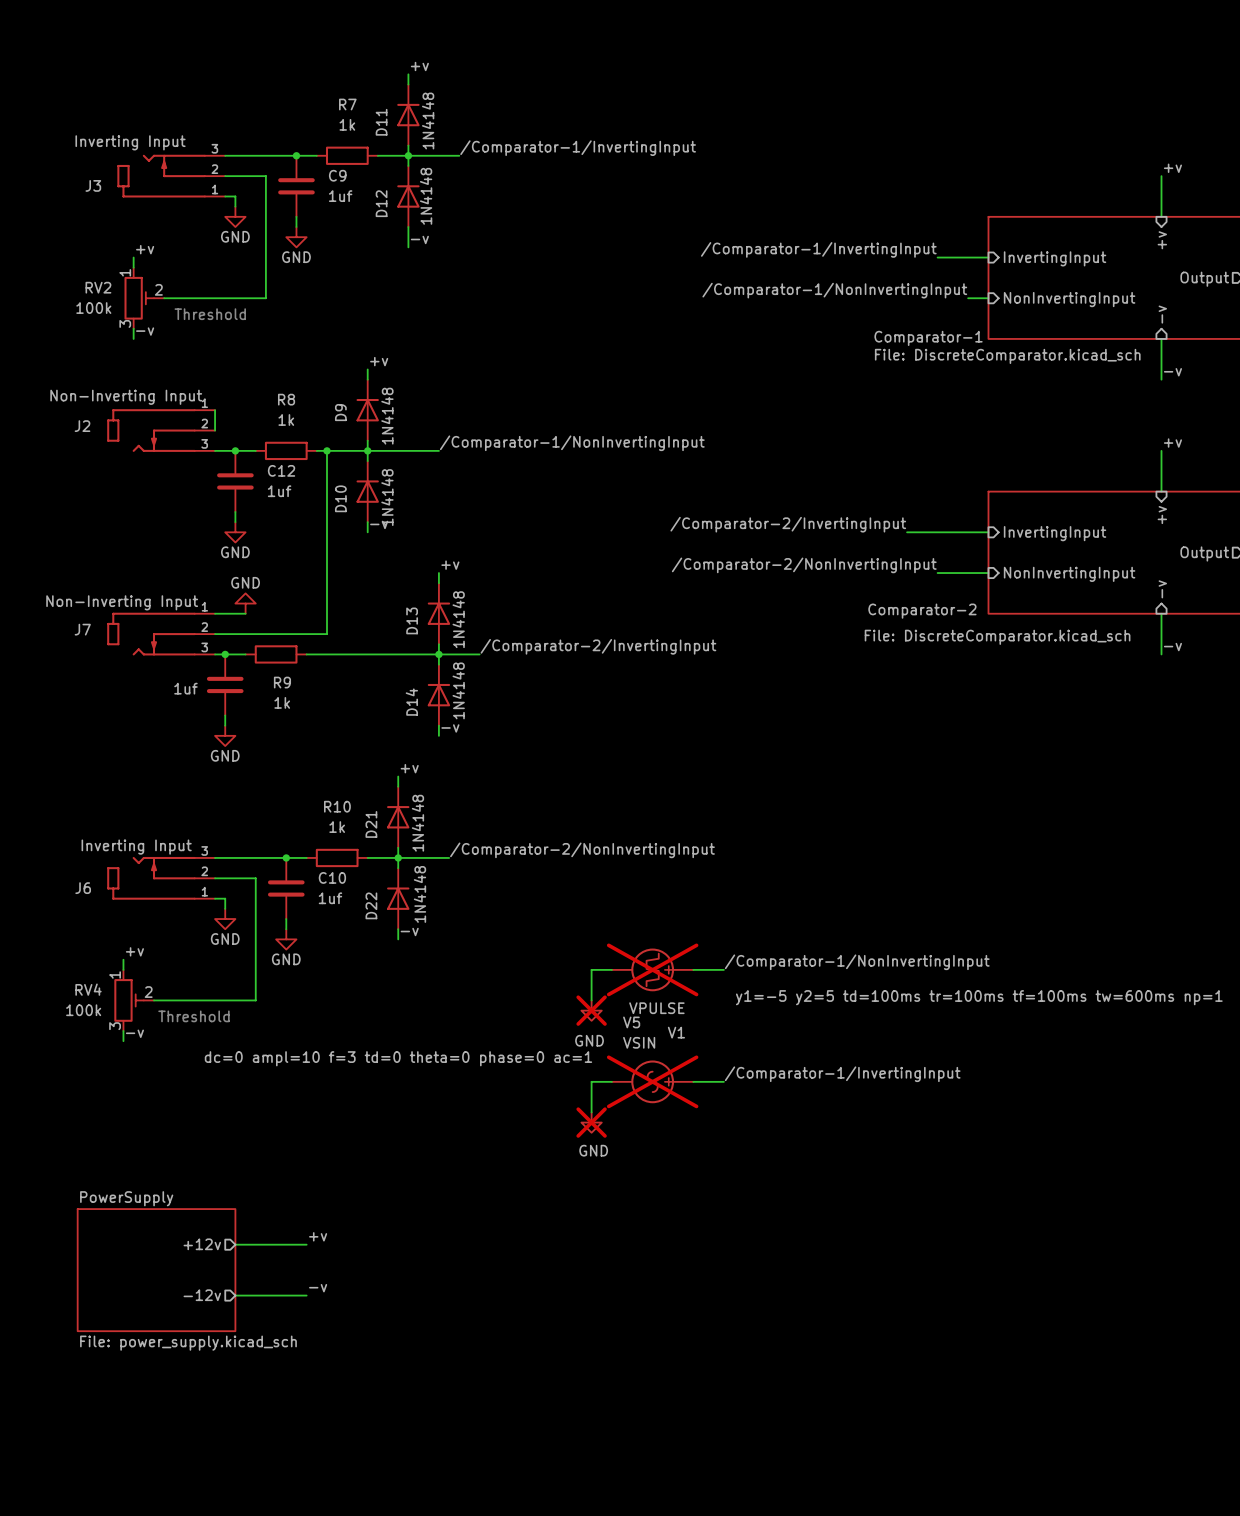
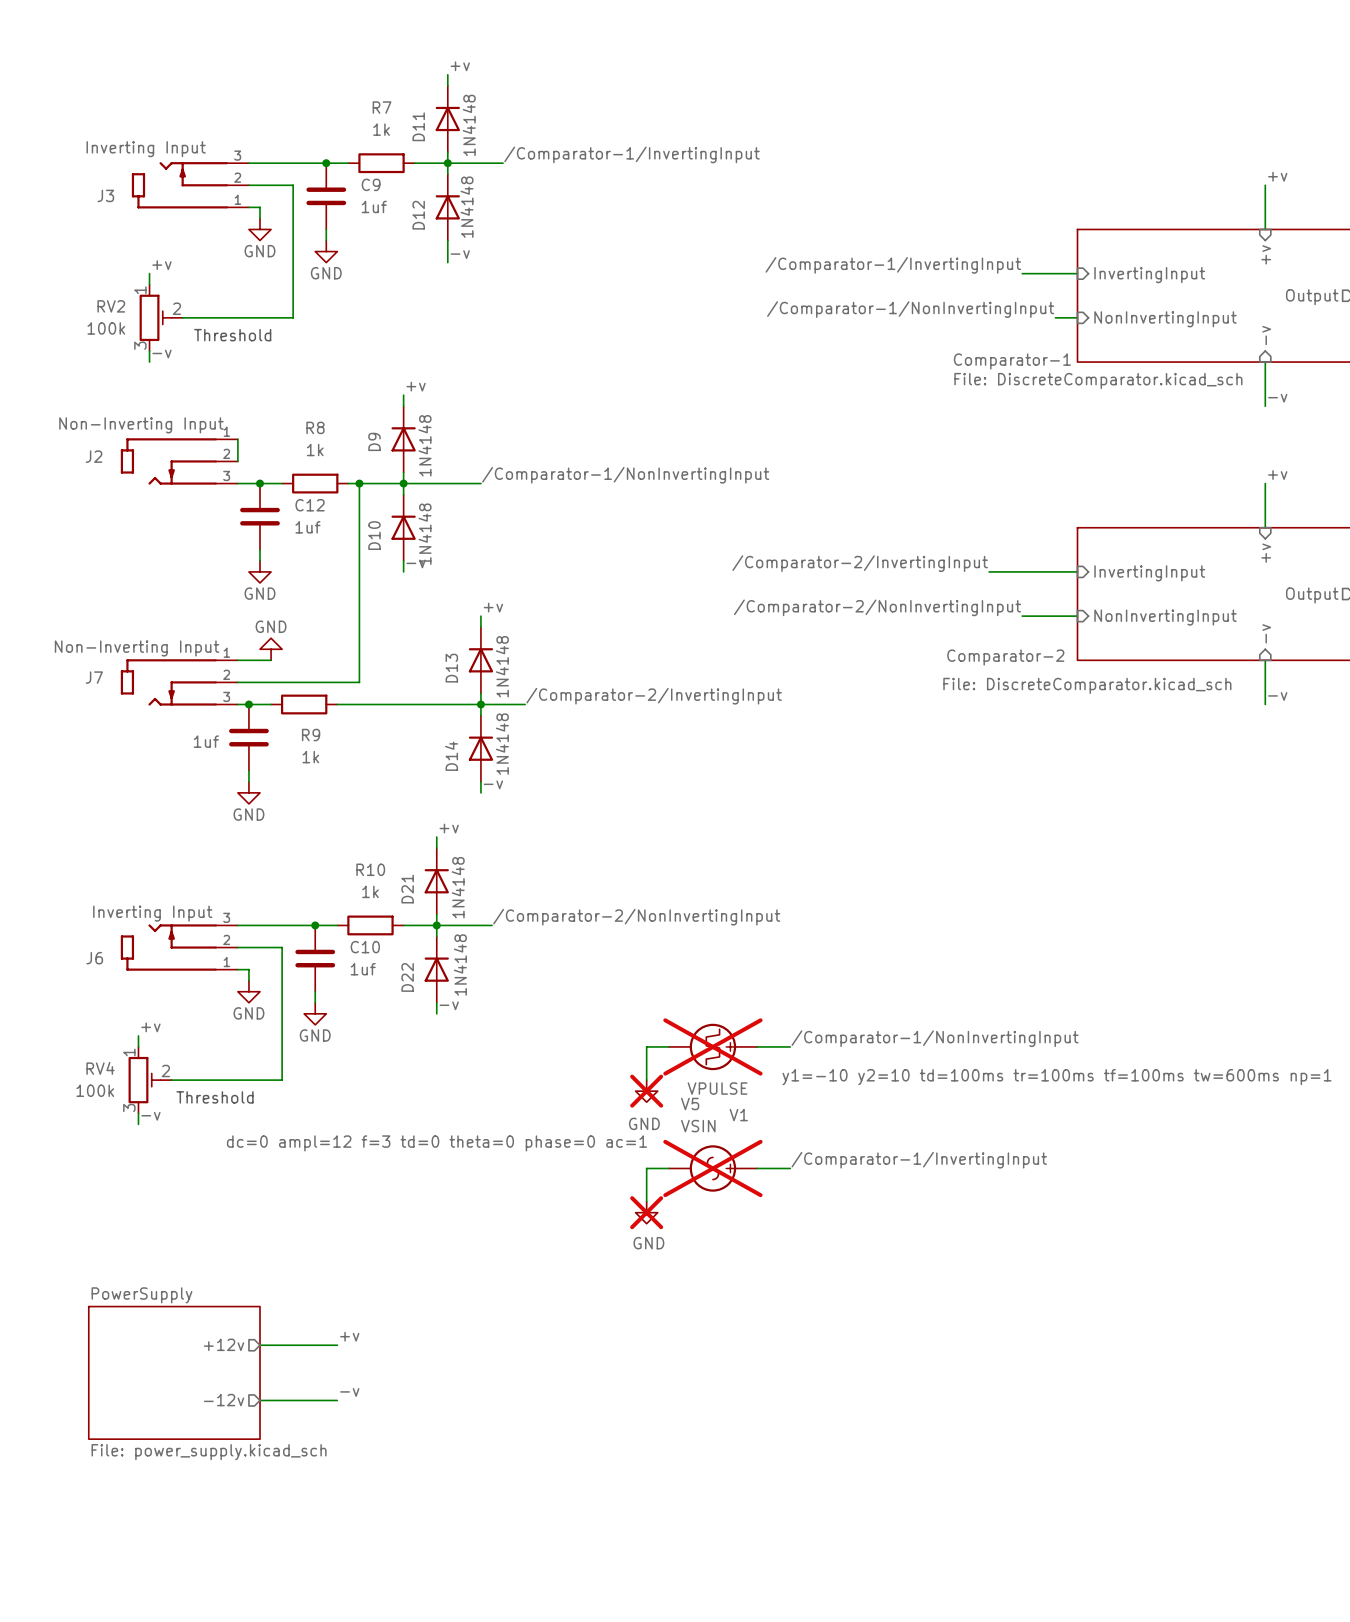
V1 text: y1=-5 y2=5 td=100ms tr=100ms tf=100ms tw=600ms np=1 (979, 997) -> y1=-10 y2=10 td=100ms tr=100ms tf=100ms tw=600ms np=1 (1057, 1077)
V5 text: dc=0 ampl=10 f=3 td=0 theta=0 phase=0 ac=1 (398, 1058) -> dc=0 ampl=12 f=3 td=0 theta=0 phase=0 ac=1 (437, 1143)

